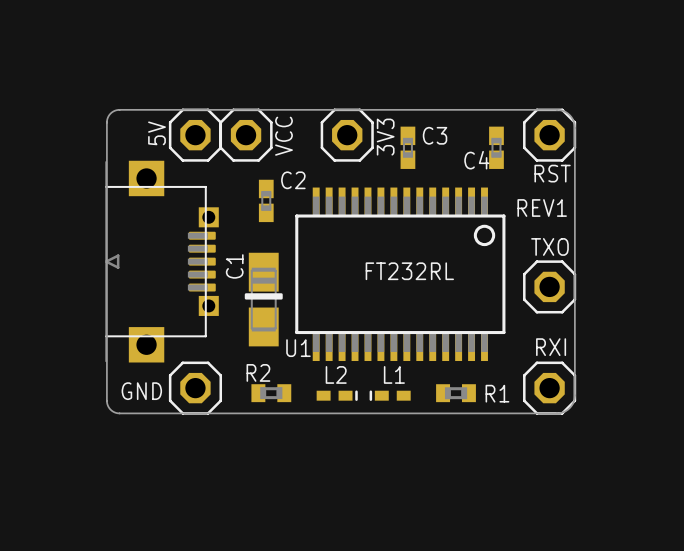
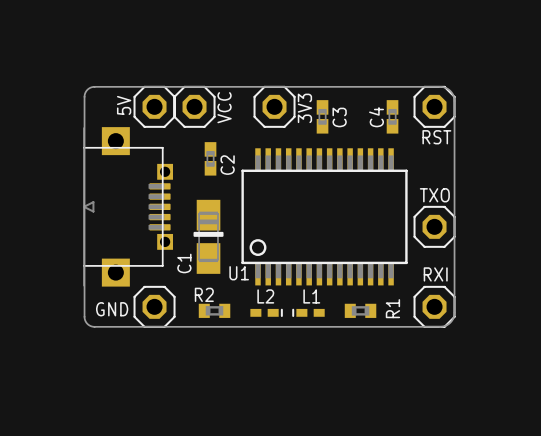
C3 name rotation: 0° (435, 135) -> 90° counterclockwise (339, 117)
C4 name rotation: 0° (476, 160) -> 90° counterclockwise (376, 117)
C2 name rotation: 0° (293, 180) -> 90° counterclockwise (227, 165)
text: REV1 (542, 208) -> none
C1 name position: C1 (234, 266) -> C1 (184, 263)
text: FT232RL (409, 271) -> none
U1 rotation: 0° (400, 274) -> 180° (324, 216)
R1 name rotation: 0° (497, 393) -> 90° counterclockwise (392, 308)

